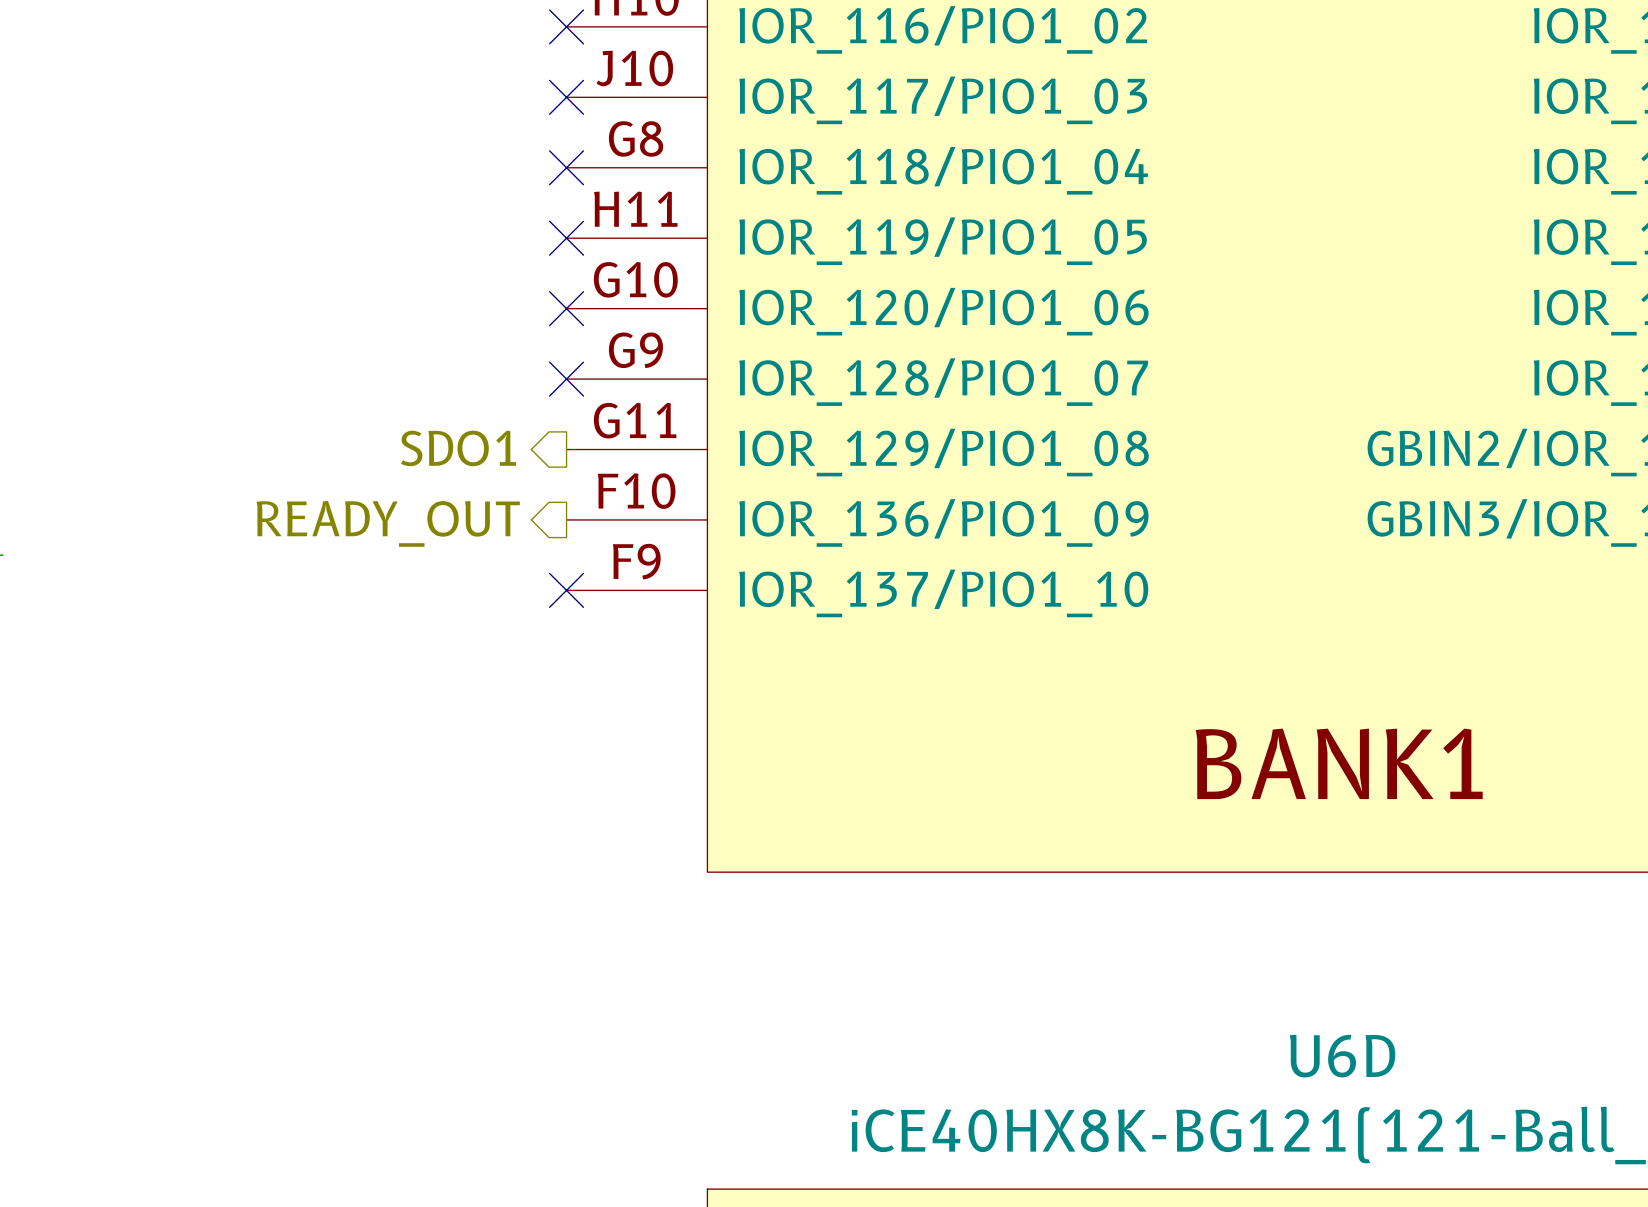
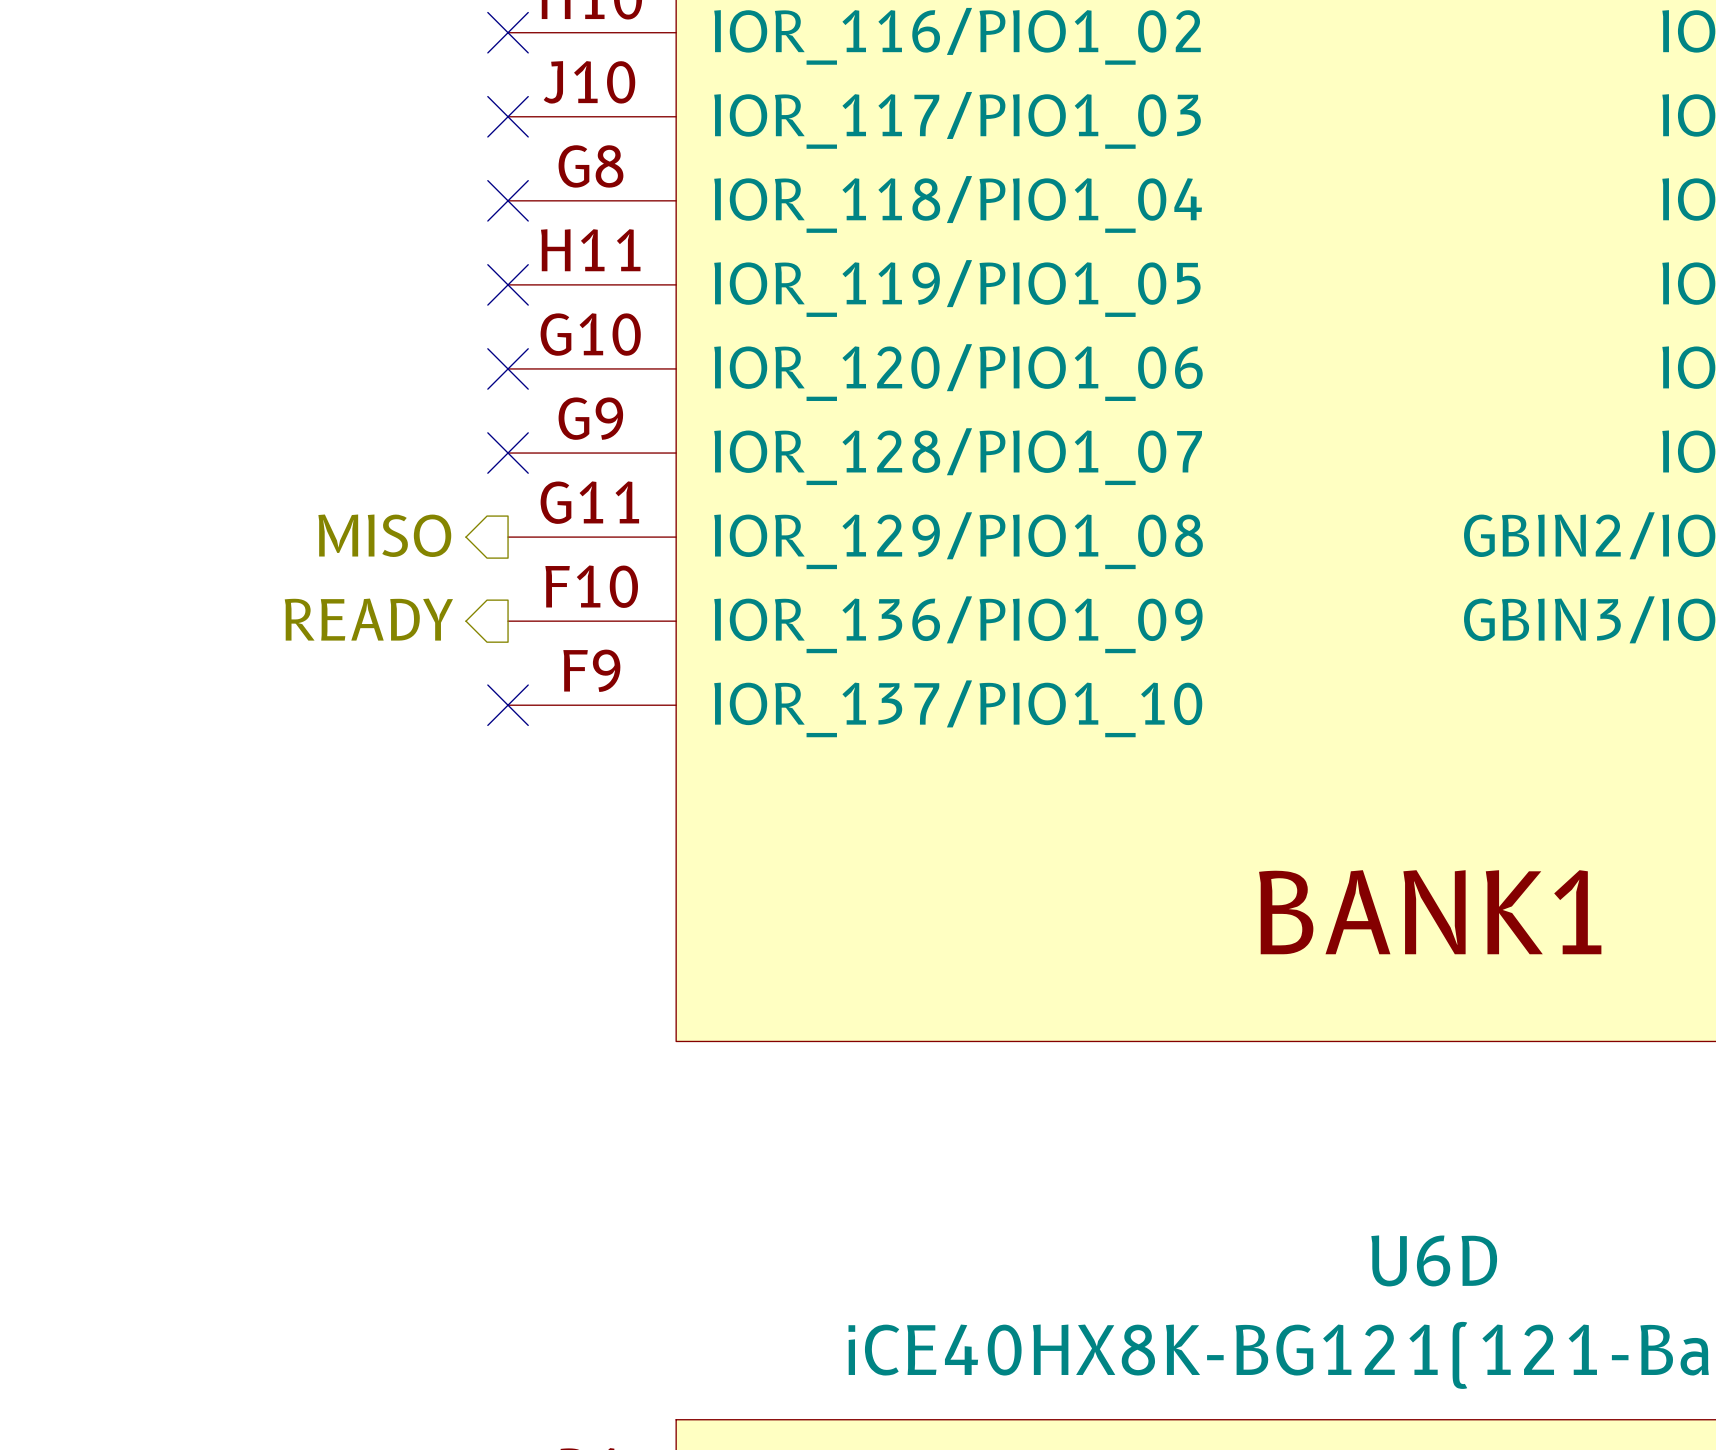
hierarchical label: SDO1 (458, 448) -> MISO (384, 535)
hierarchical label: READY_OUT (388, 523) -> READY (368, 619)

